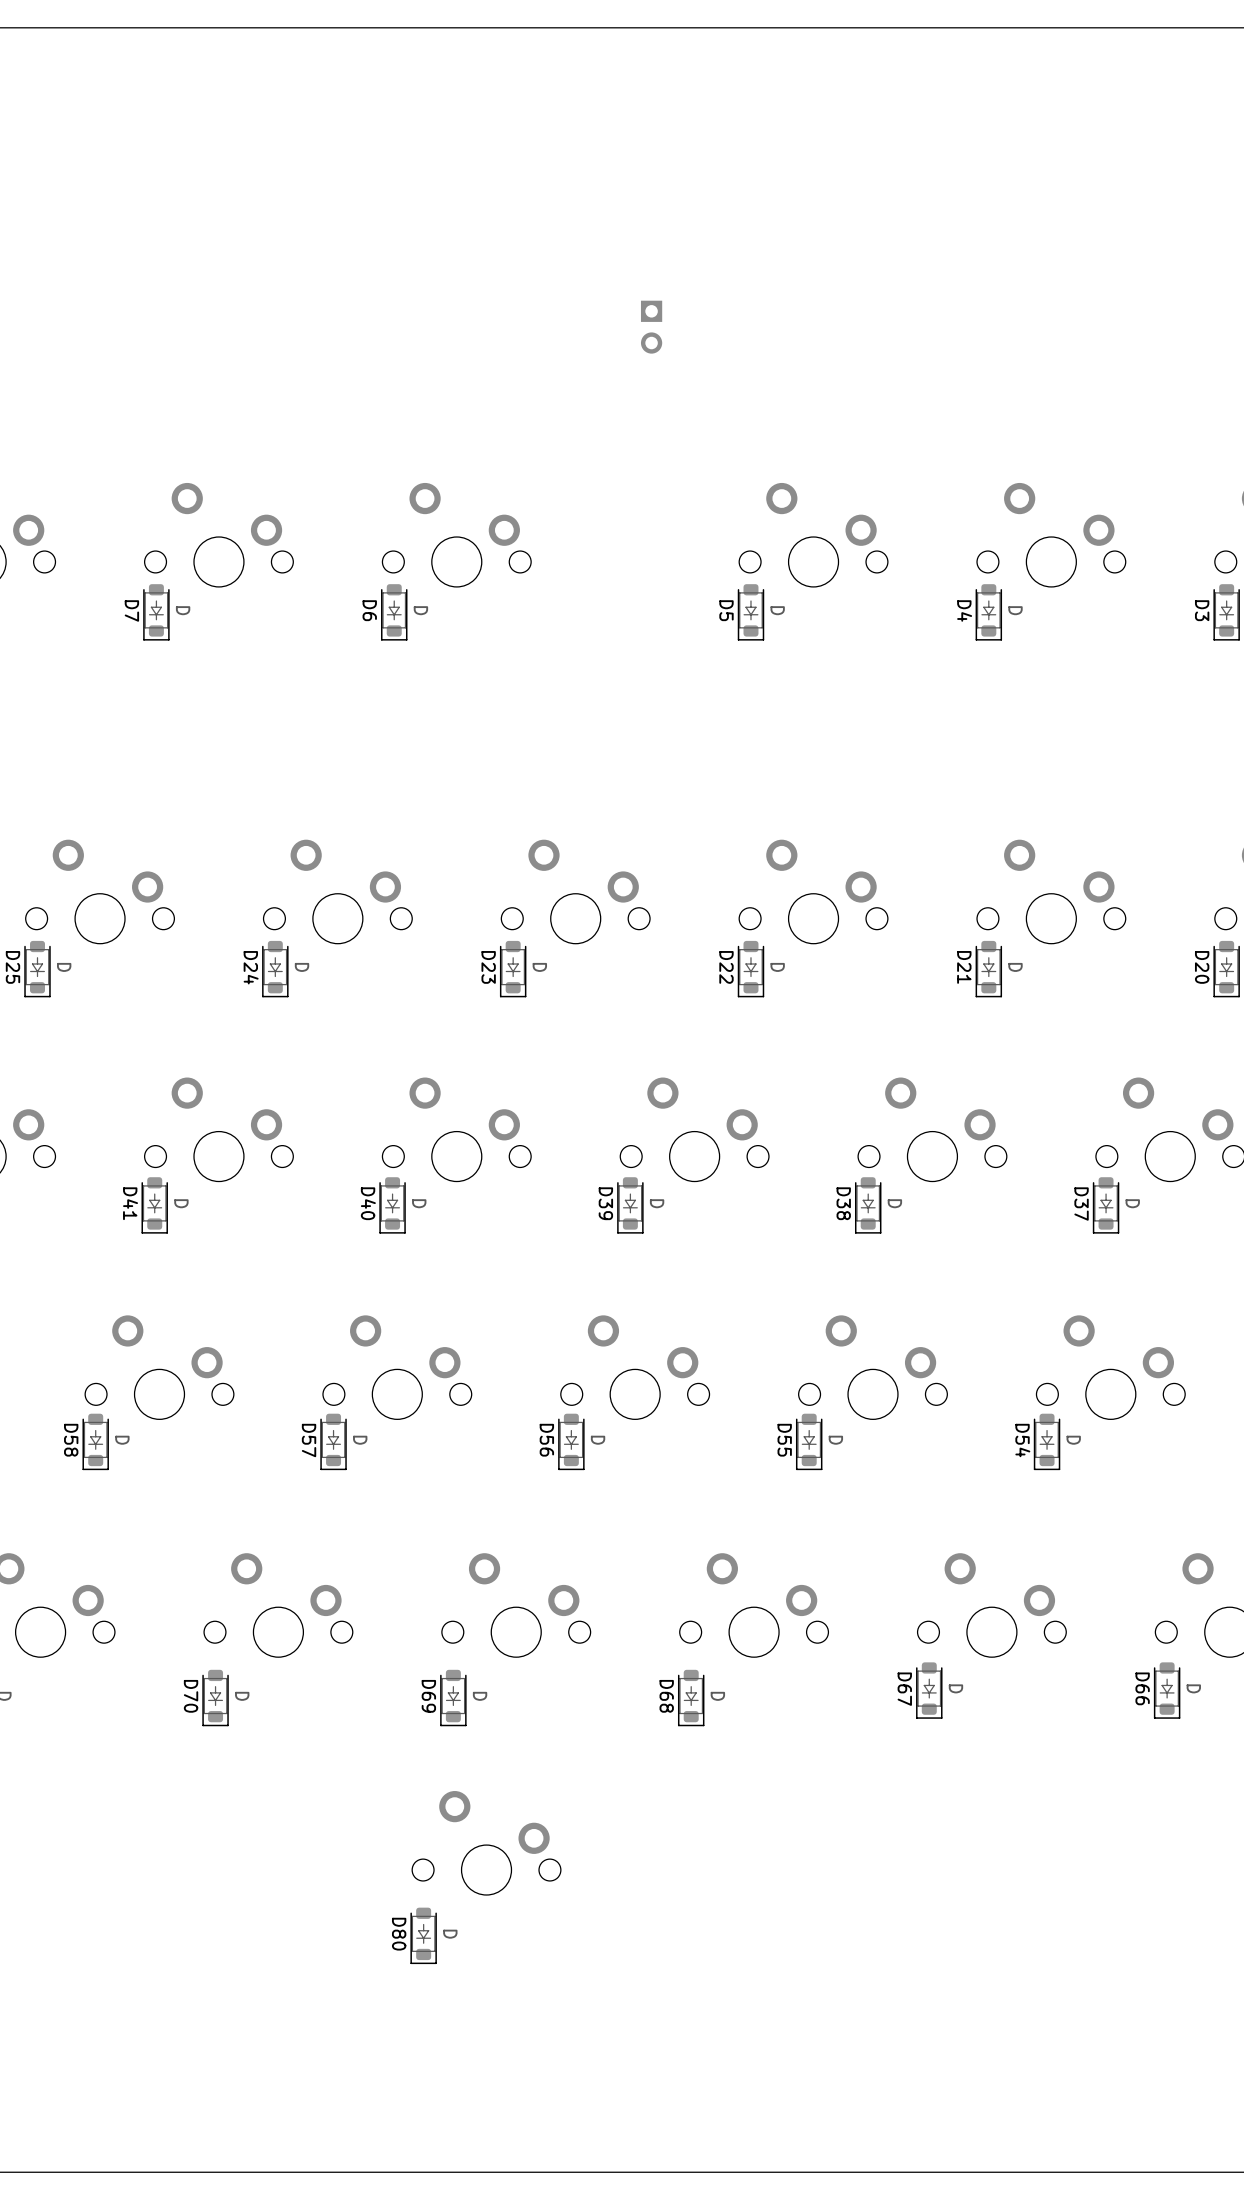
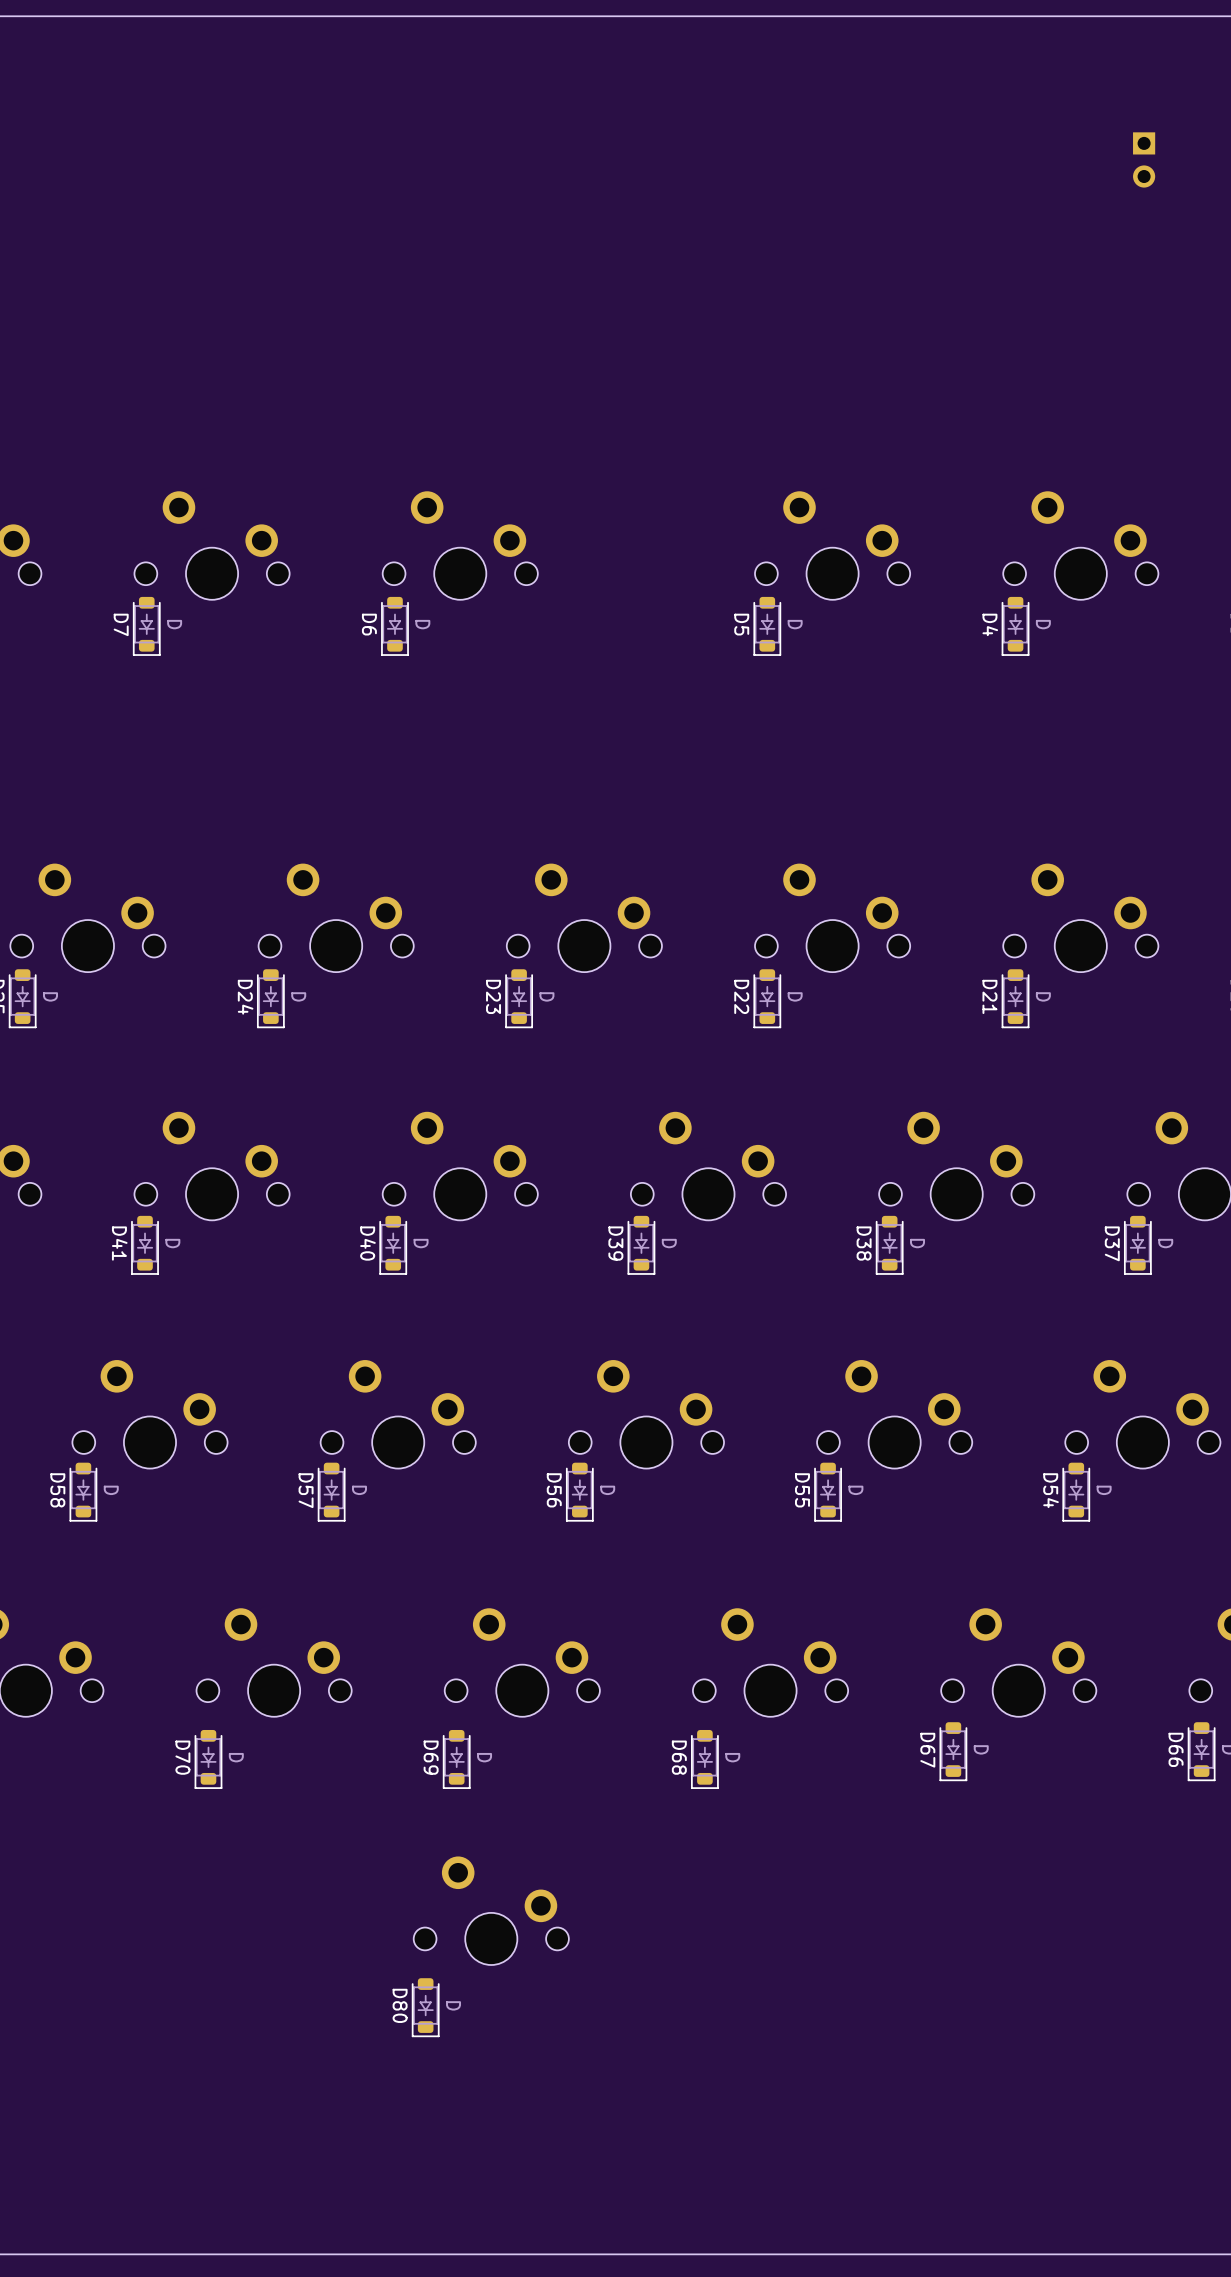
part: none -> (1144, 159)
part: (651, 327) -> none

